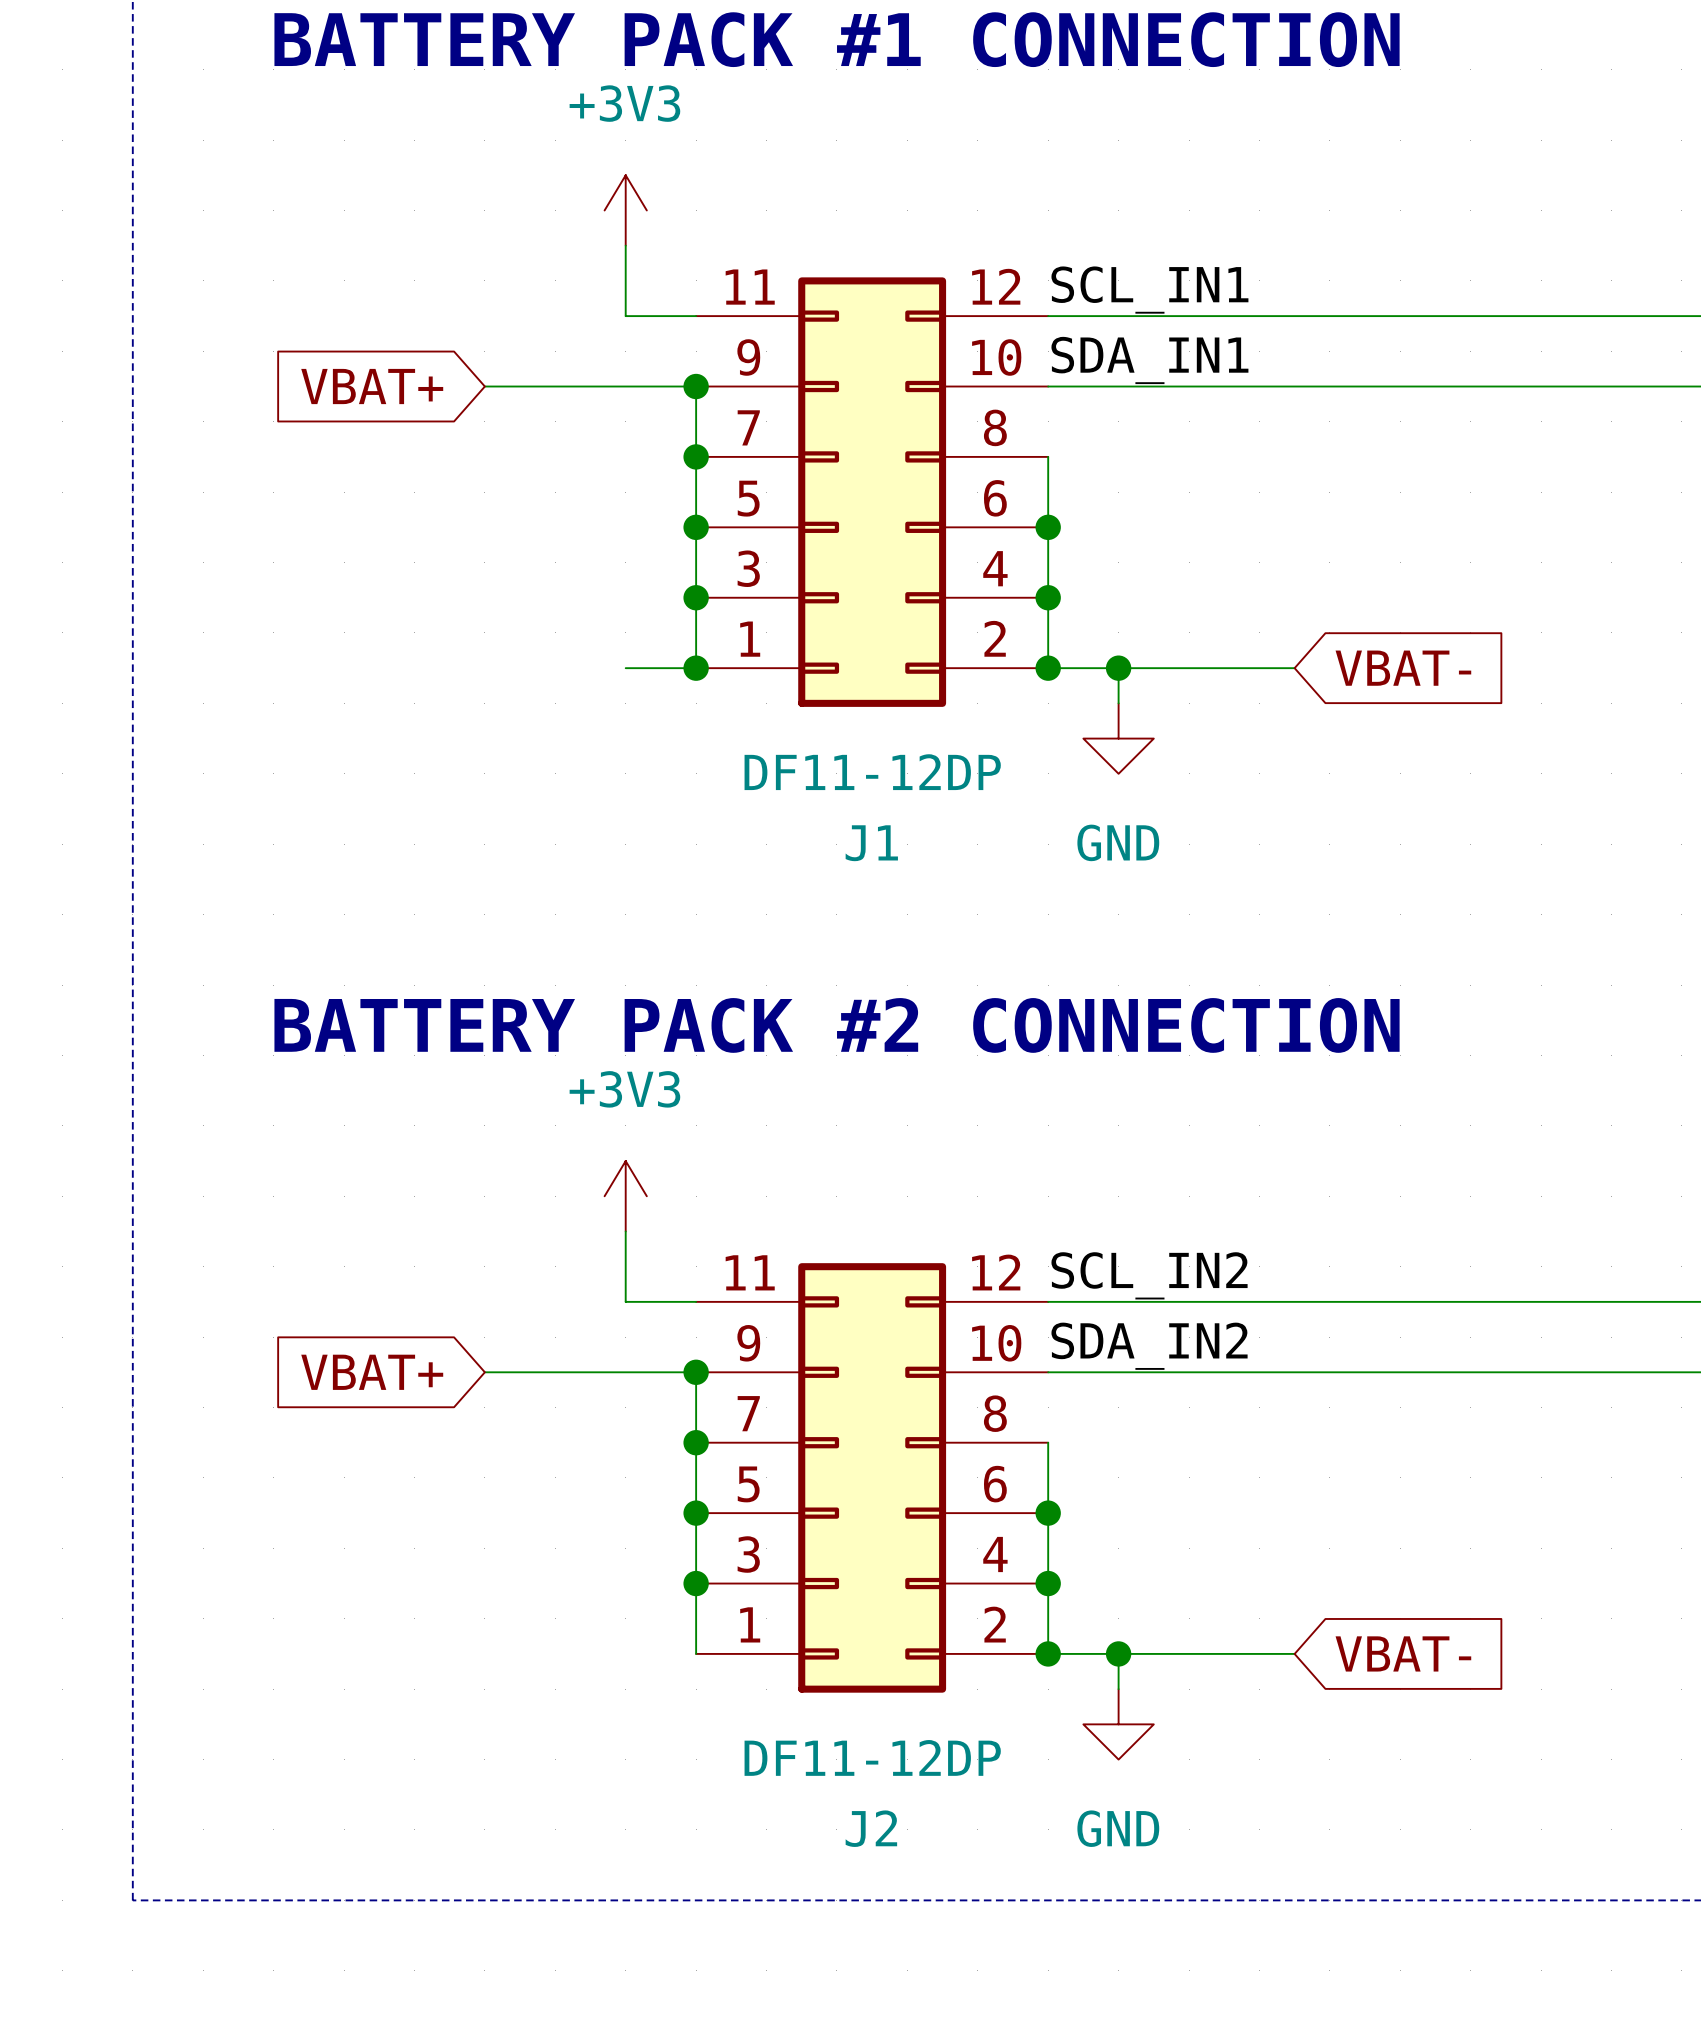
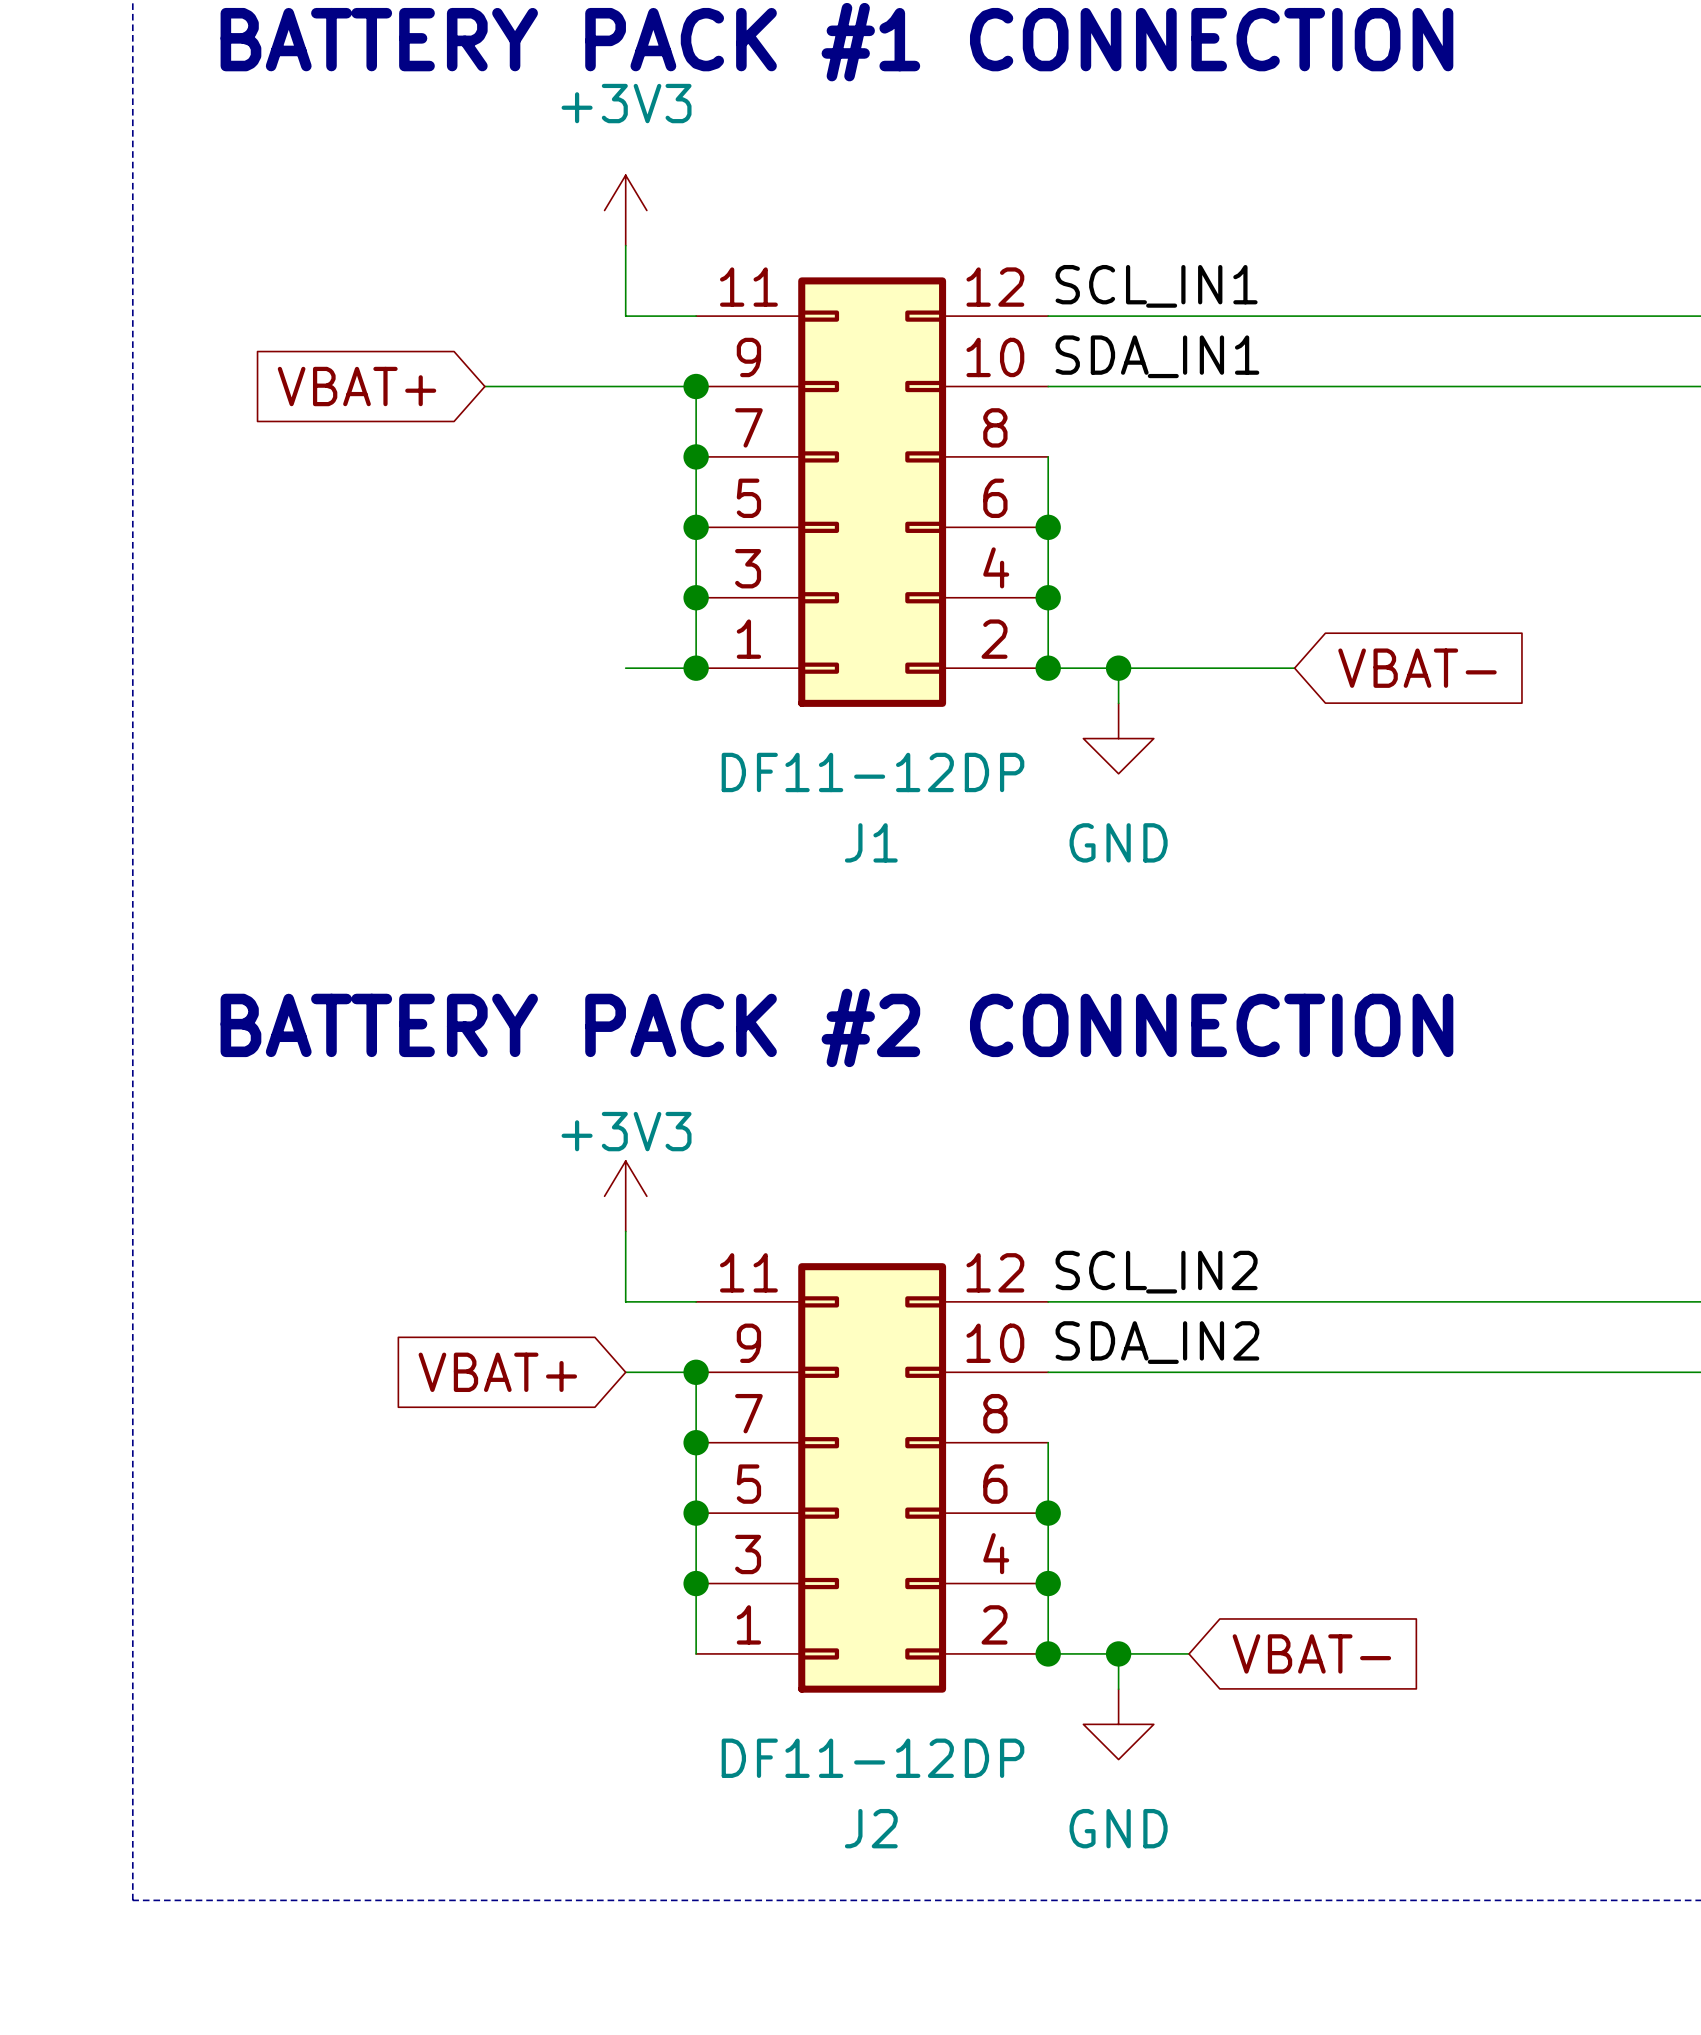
power symbol text position: +3V3 (624, 1089) -> +3V3 (626, 1131)
global label position: VBAT+ (372, 1372) -> VBAT+ (497, 1372)
wire: (484, 1372) (625, 1372) -> none
wire: (1189, 1653) (1294, 1653) -> none
global label position: VBAT- (1403, 1653) -> VBAT- (1311, 1653)

